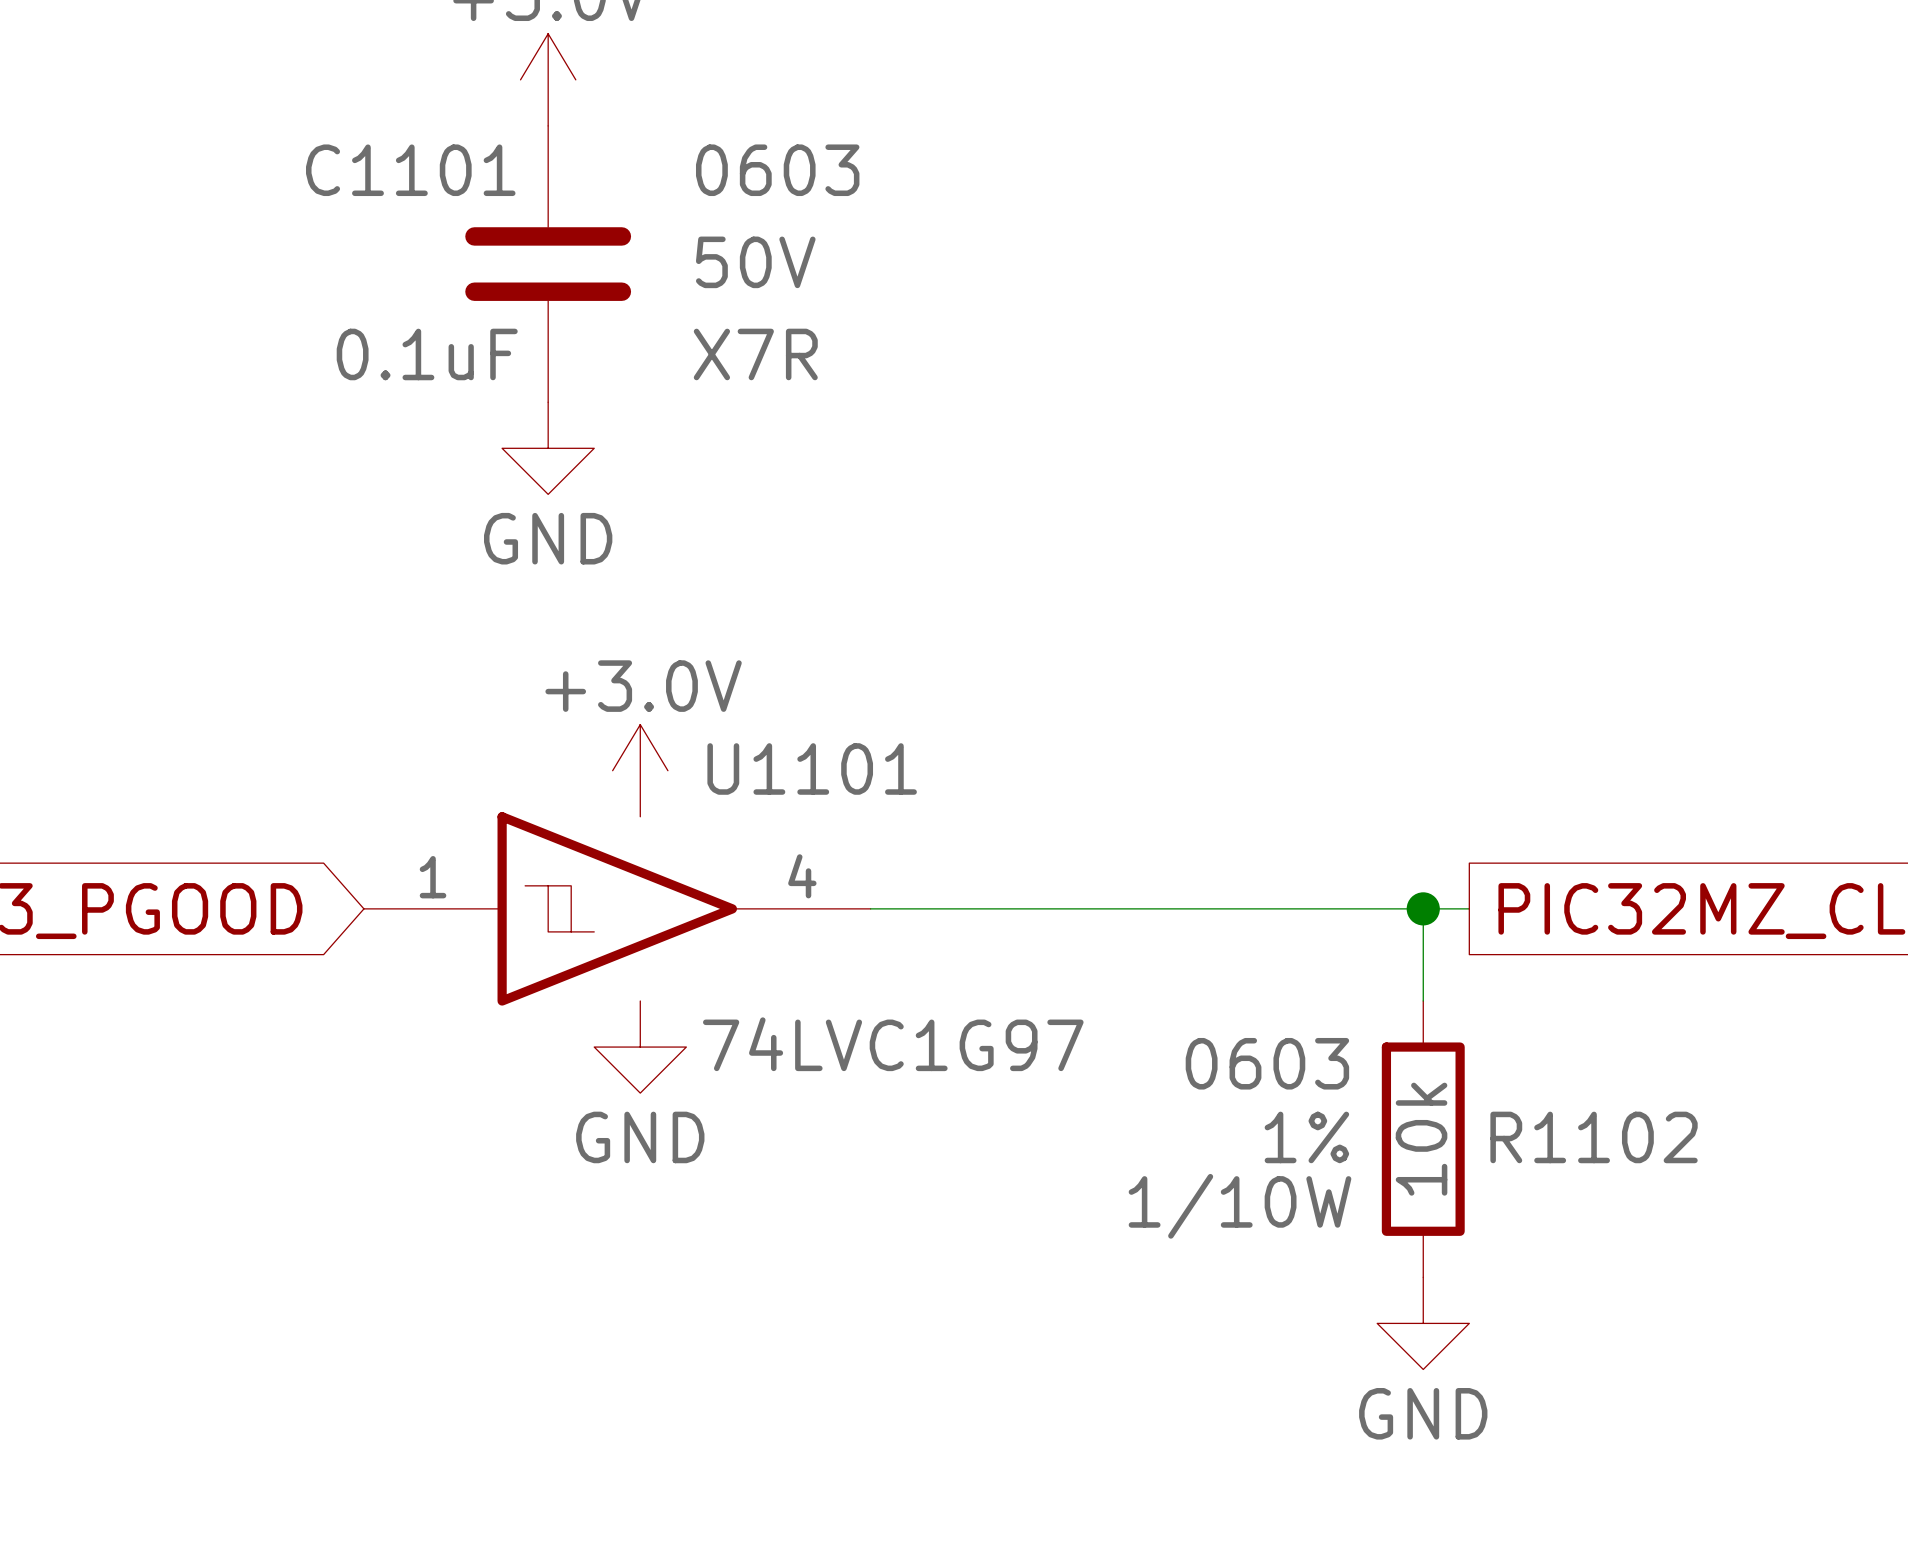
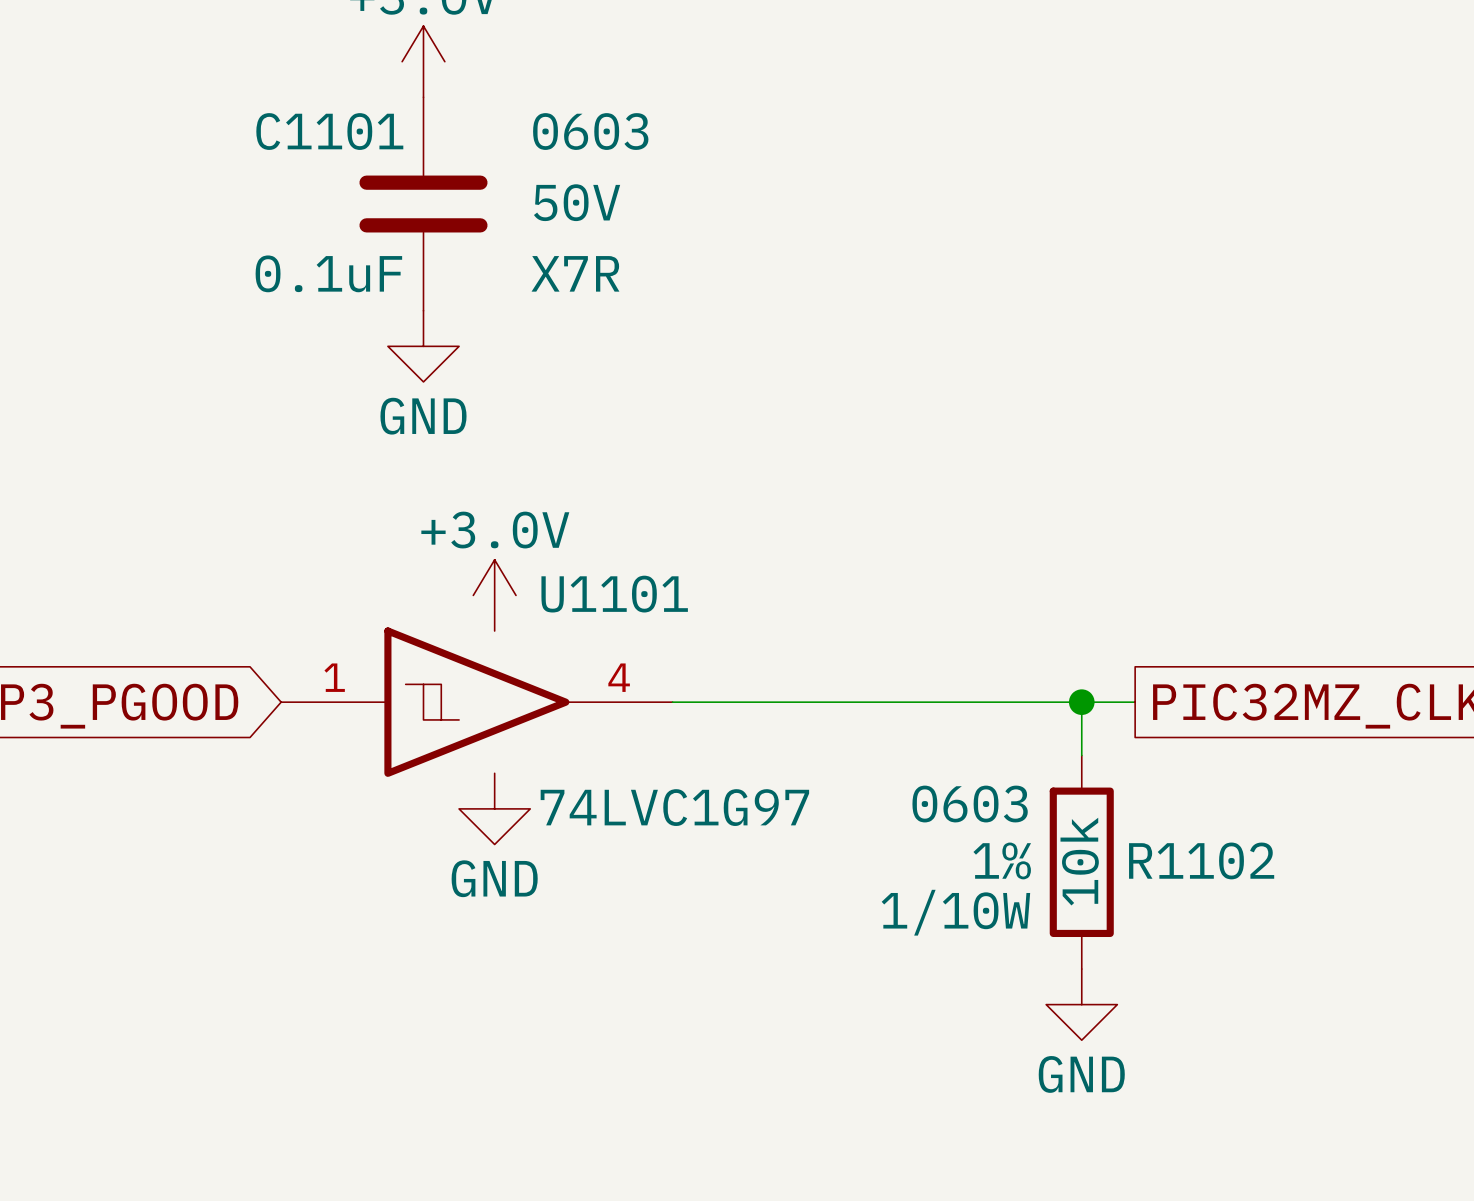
wire: none -> (1081, 702) (1081, 755)
wire: (1423, 908) (1423, 1001) -> none
junction position: (1423, 908) -> (1081, 702)
R1102 position: (1423, 1139) -> (1081, 862)
power symbol position: GND (1423, 1323) -> GND (1081, 1004)

